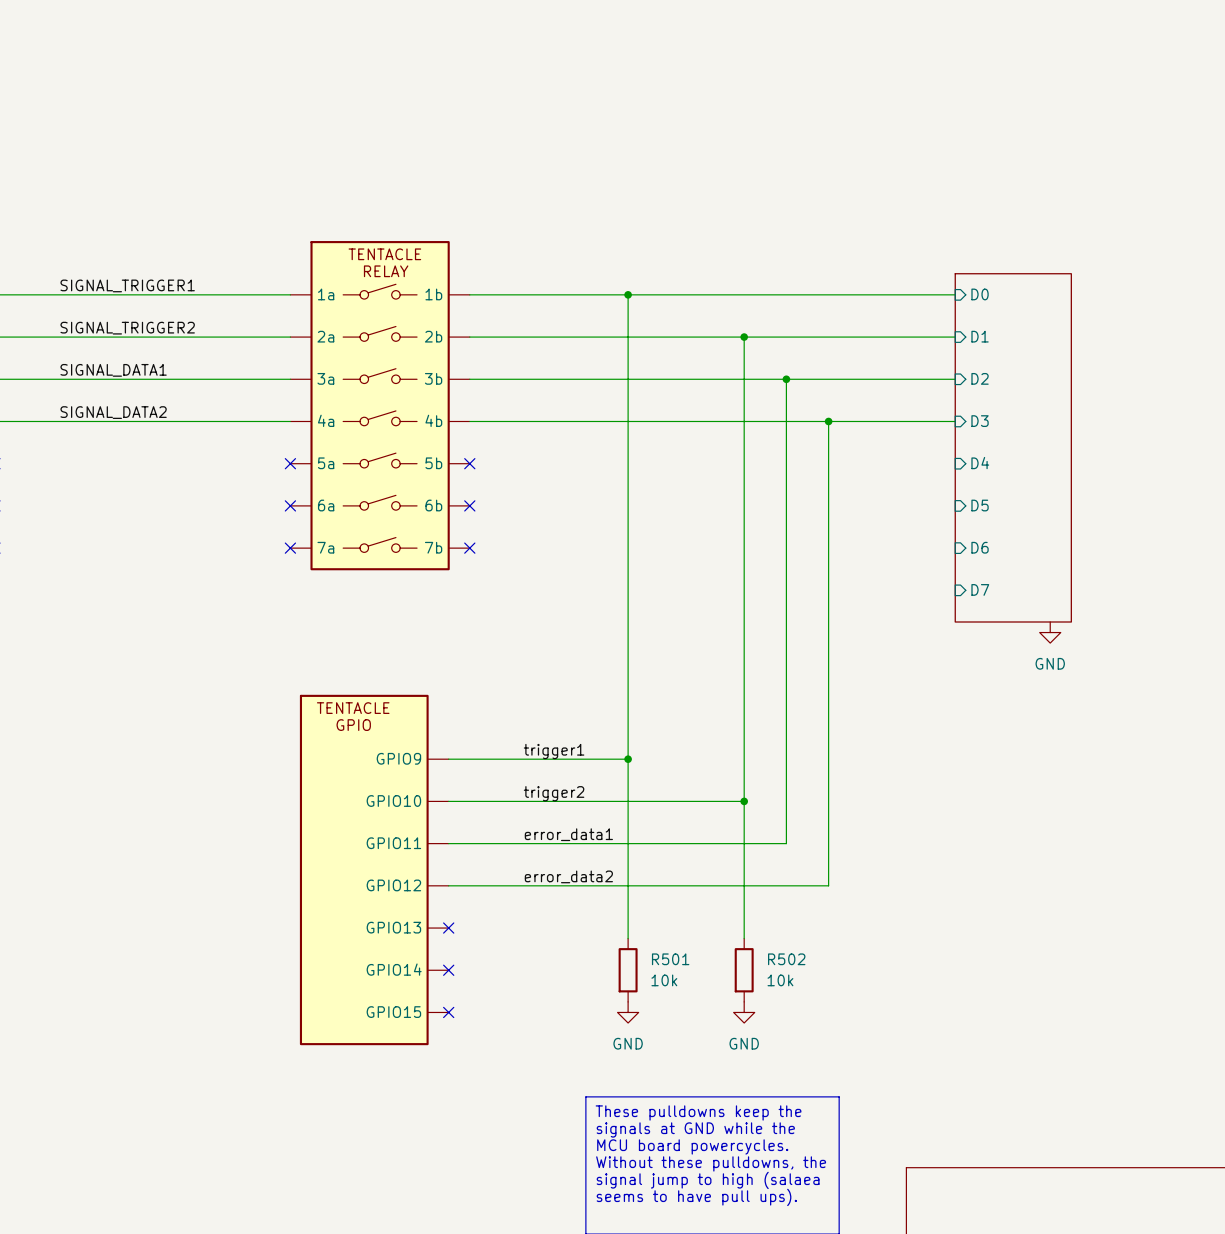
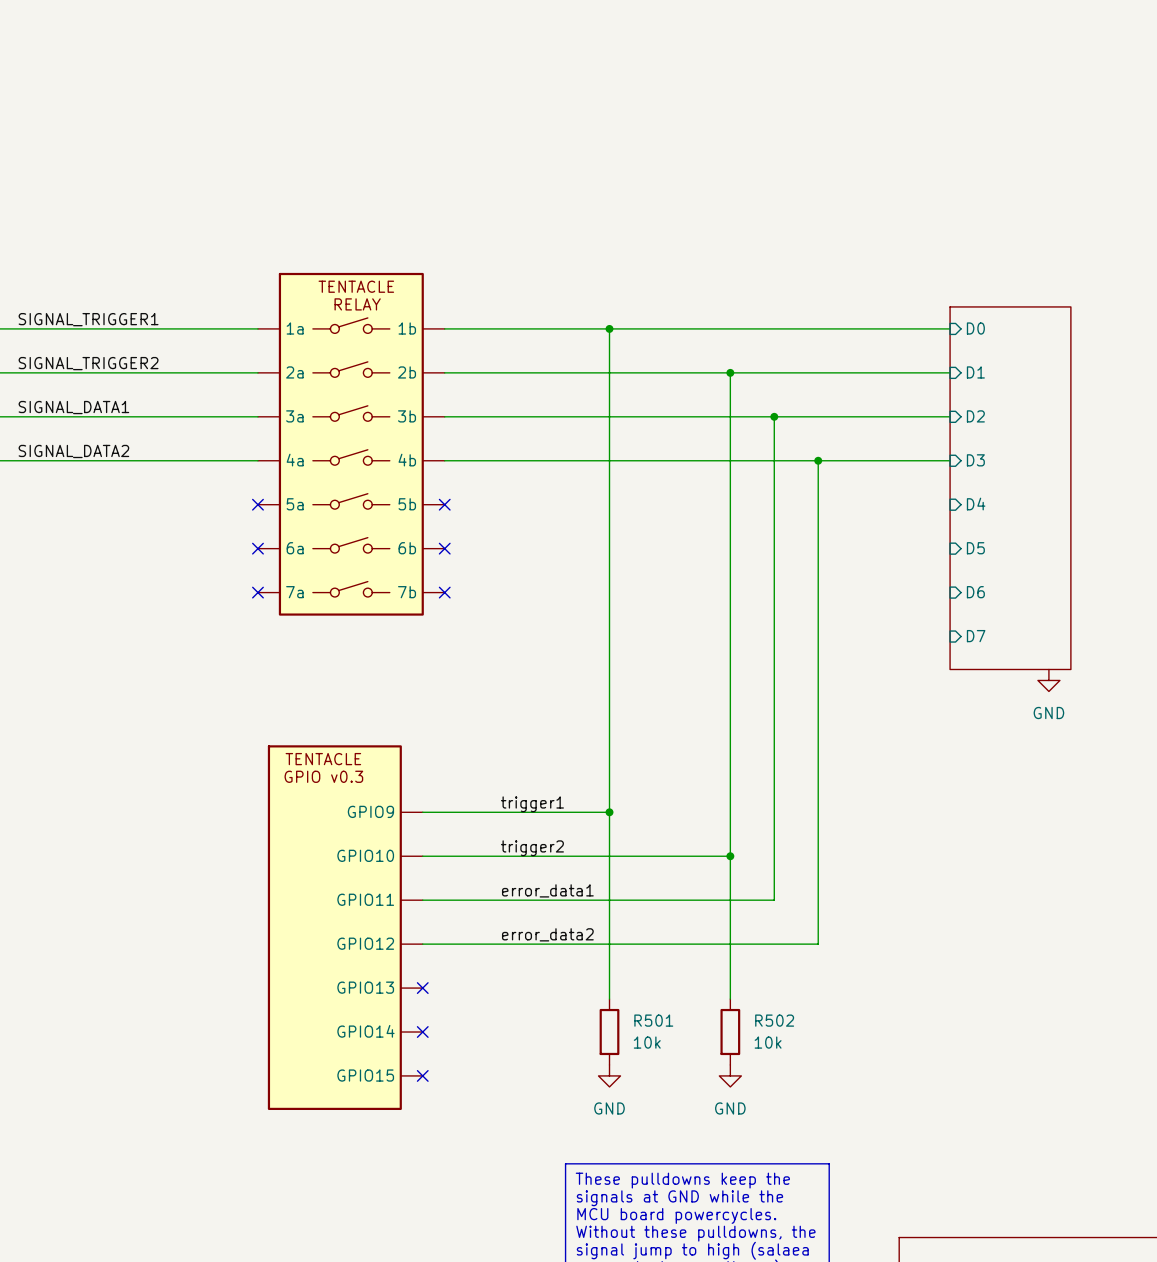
part text: GPIO (353, 725) -> GPIO v0.3 (323, 776)

